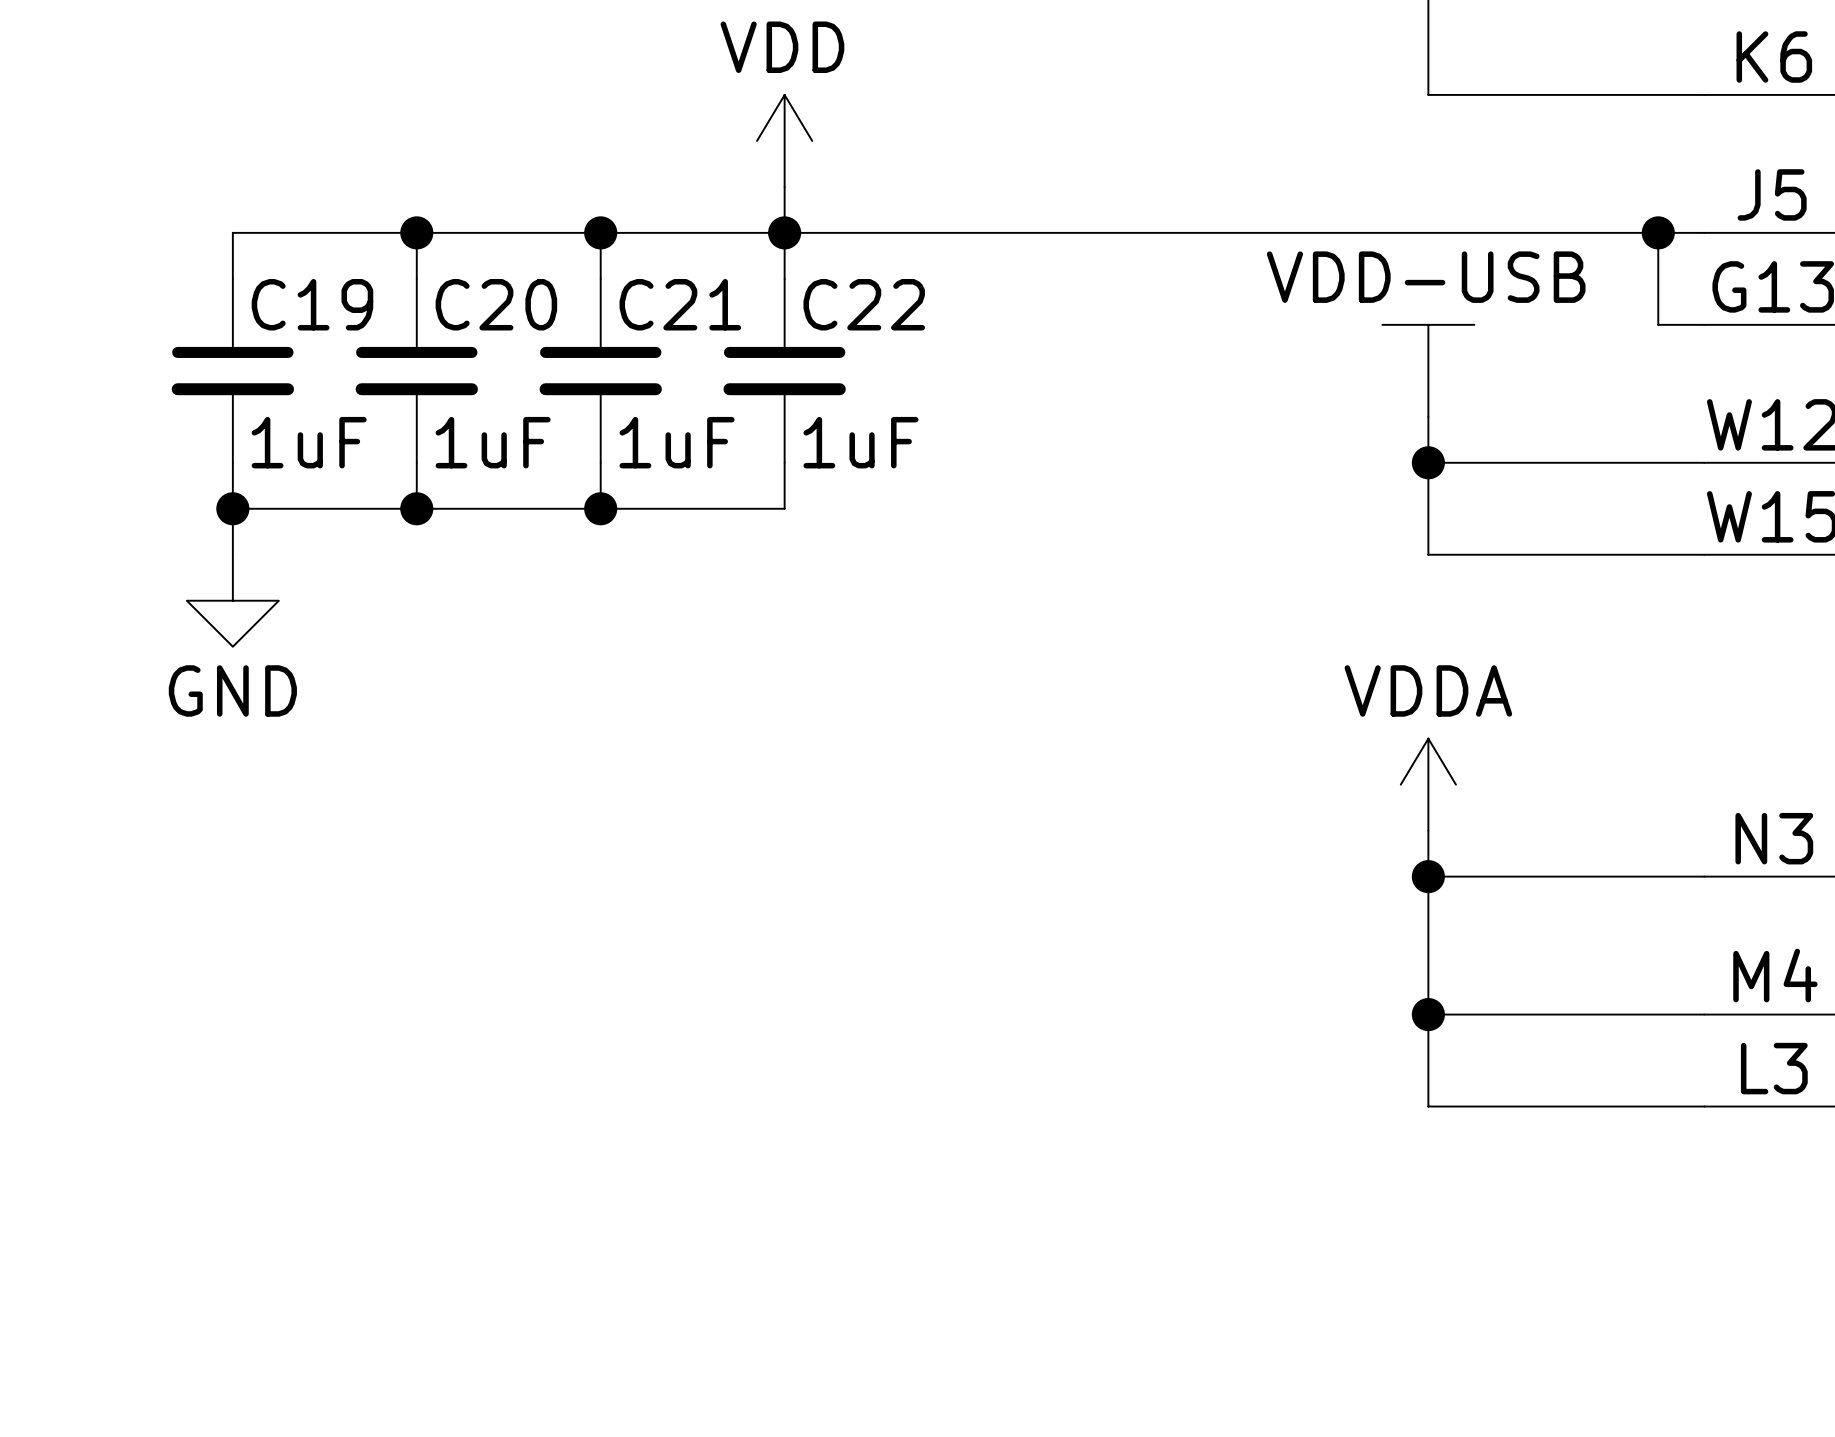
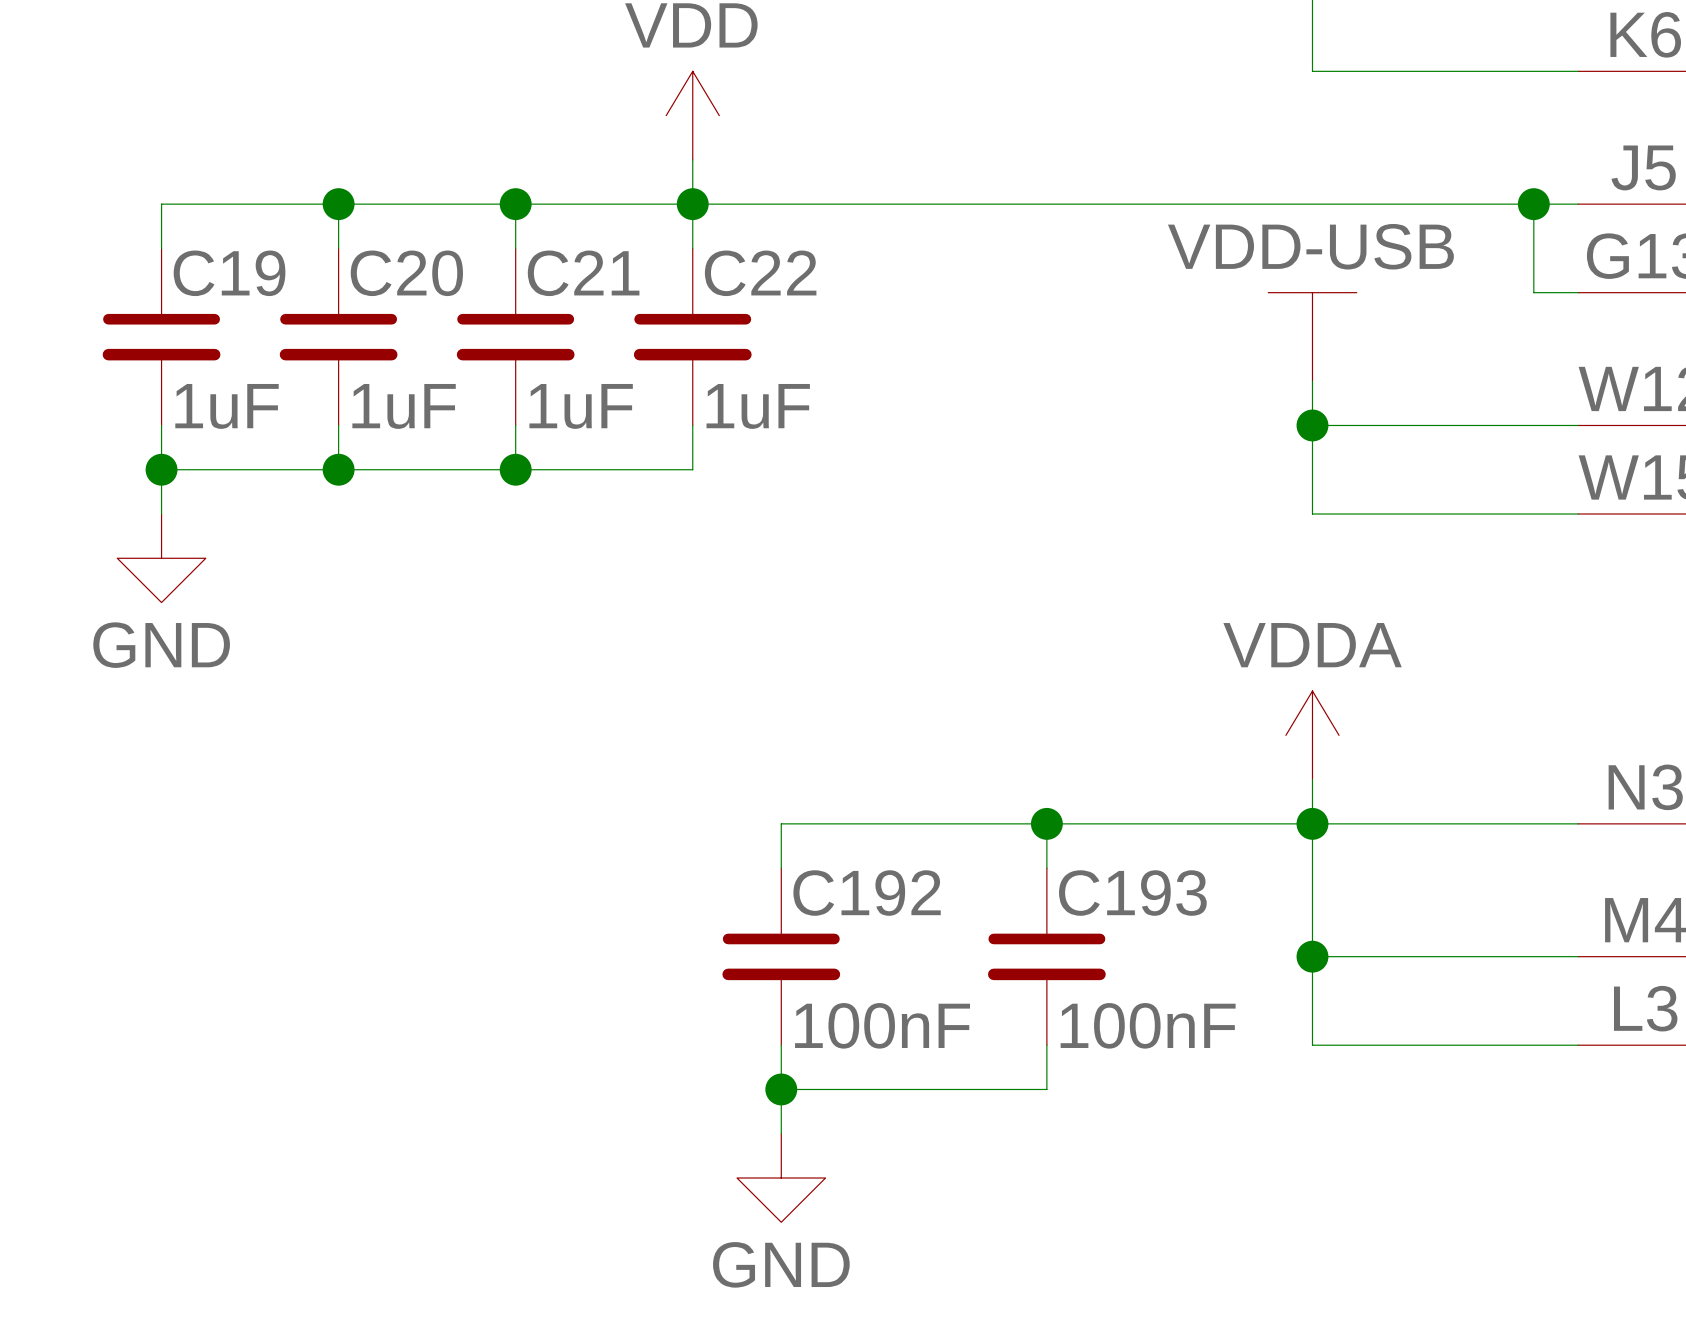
wire: none -> (1046, 823) (1046, 868)
junction: none -> (1046, 823)
wire: none -> (1312, 823) (781, 823) (781, 868)
C192: none -> 100nF (781, 956)
C193: none -> 100nF (1046, 956)
wire: none -> (781, 1045) (781, 1133)
wire: none -> (1046, 1045) (1046, 1089) (781, 1089)
junction: none -> (781, 1089)
power symbol: none -> GND (781, 1178)

